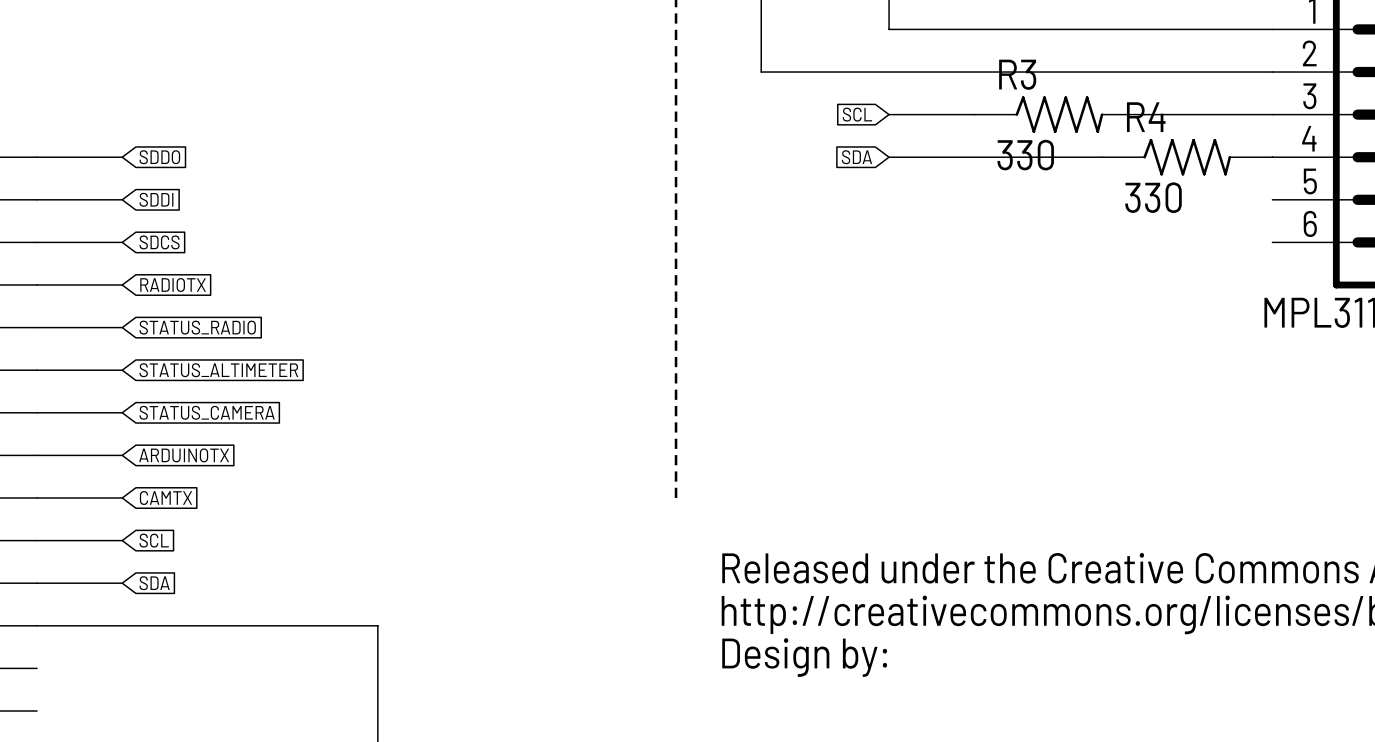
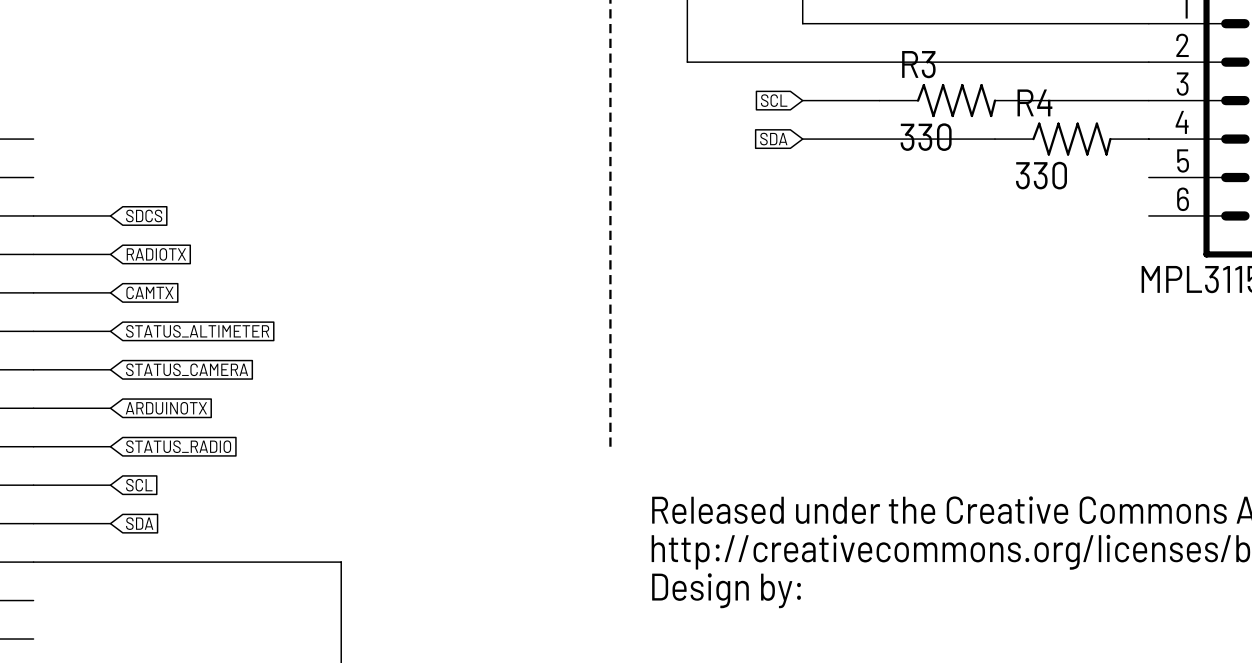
wire: (37, 157) (122, 157) -> none
global label: SDDO (159, 157) -> none
wire: (37, 199) (122, 199) -> none
global label: SDDI (156, 199) -> none
global label: STATUS_RADIO (197, 327) -> CAMTX (149, 292)
global label: CAMTX (165, 498) -> STATUS_RADIO (178, 446)

